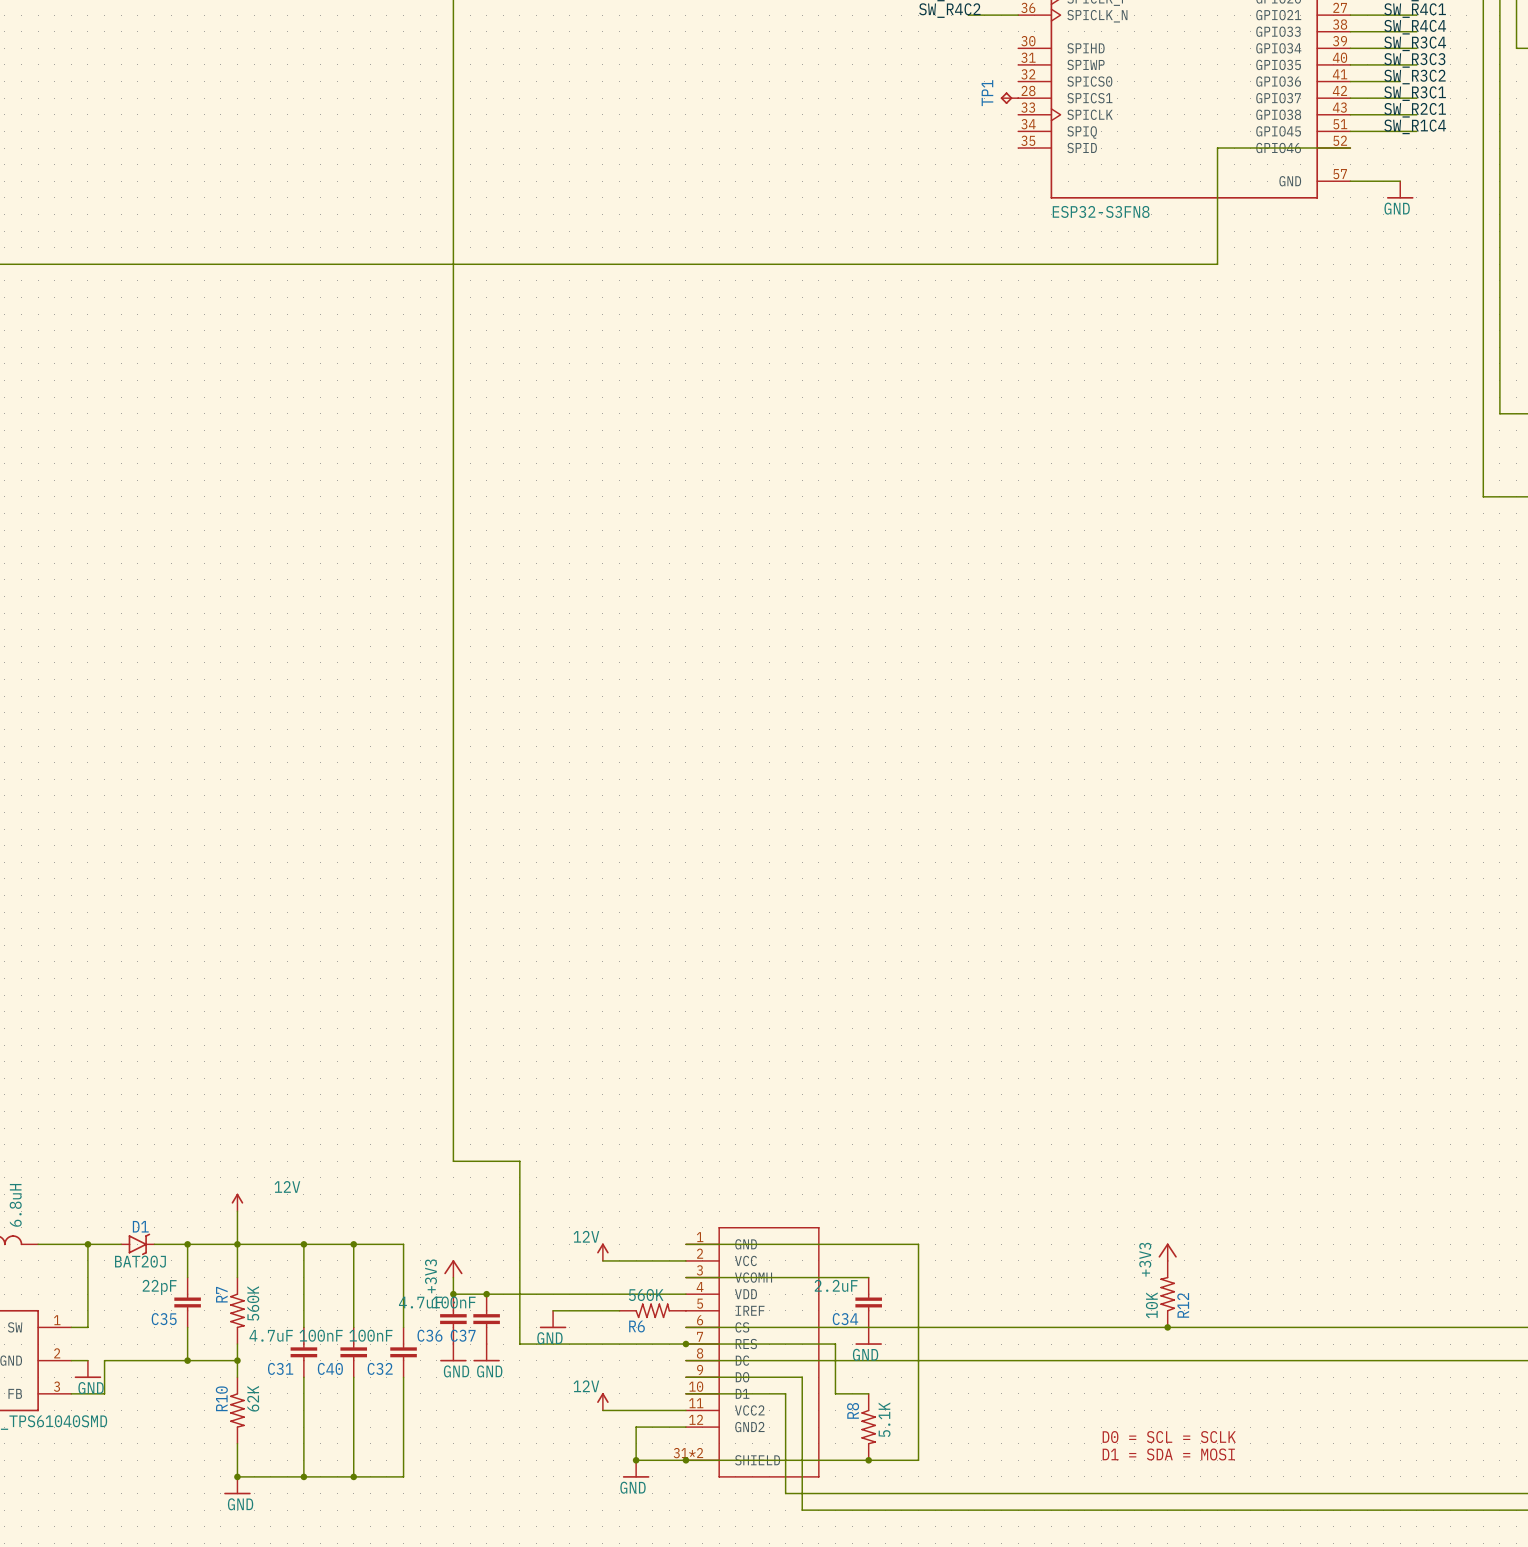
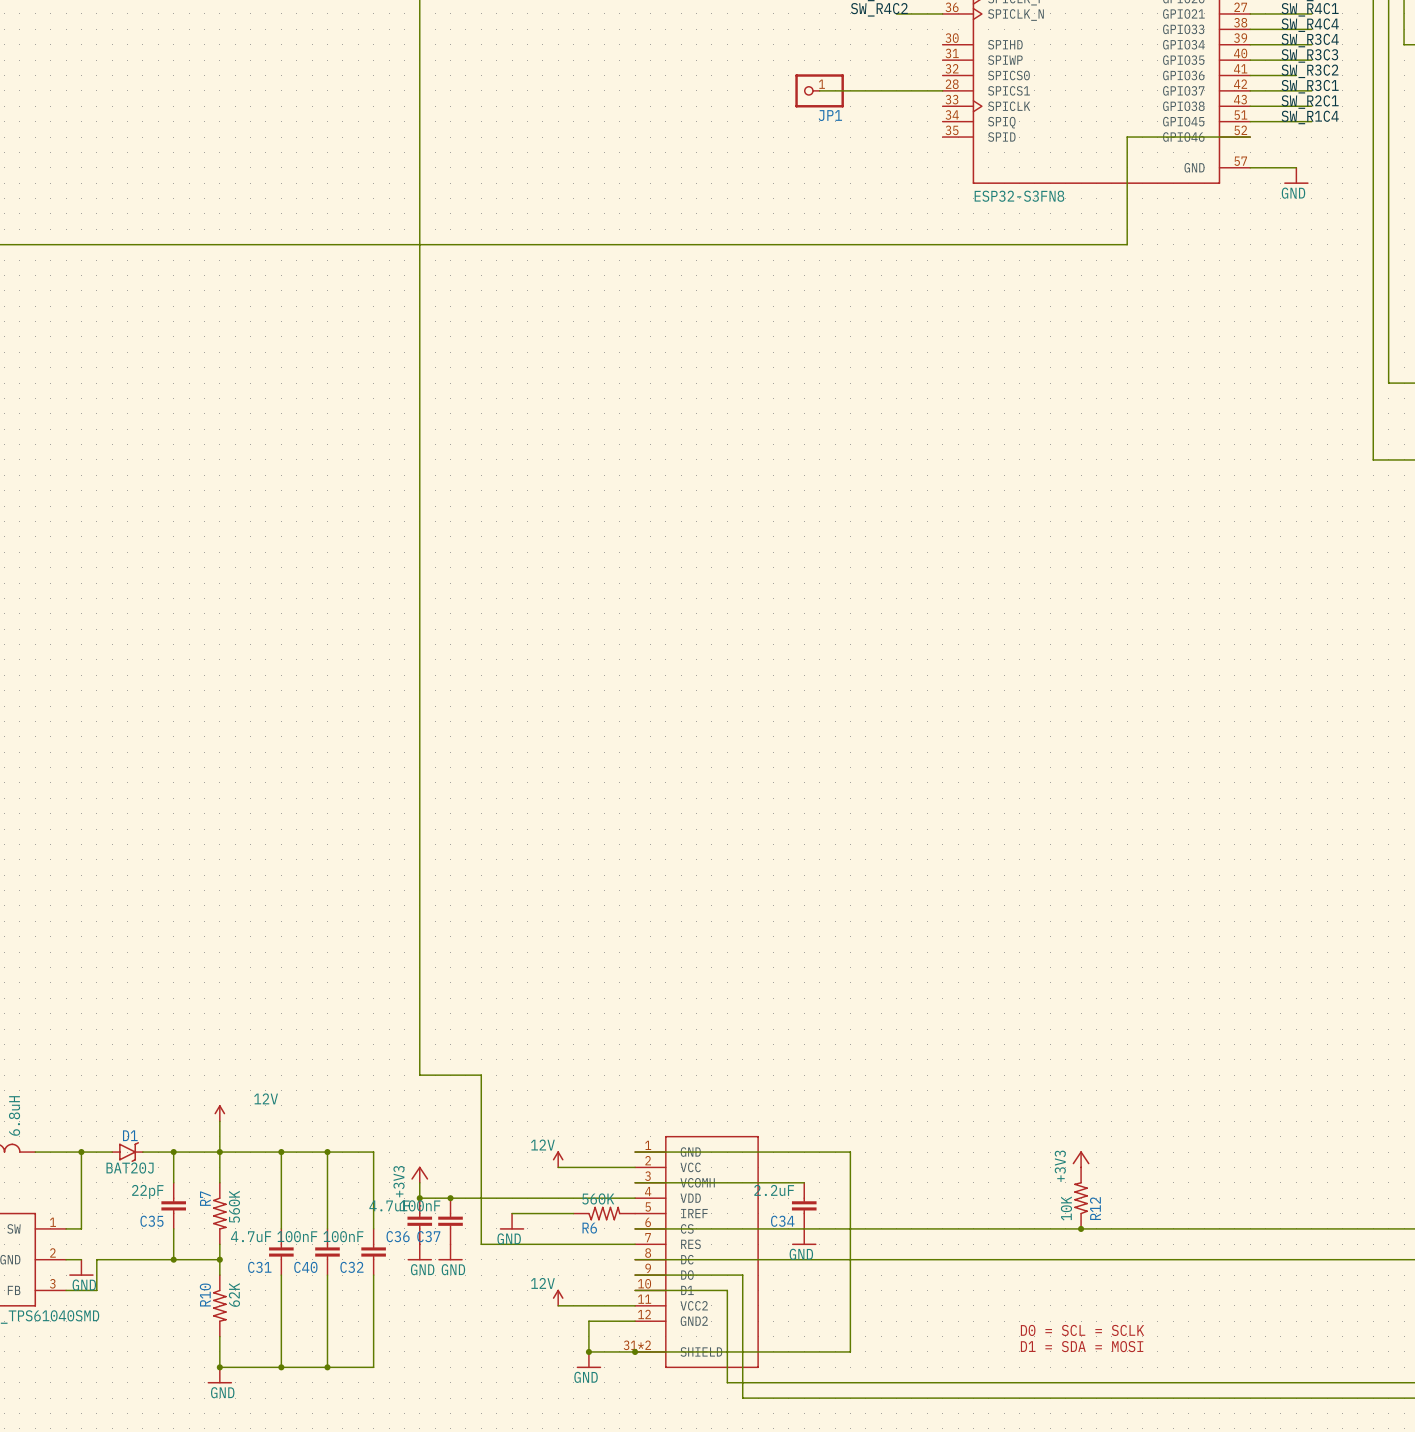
wire: none -> (819, 90) (942, 90)
JP1: none -> (819, 90)
TP1: (1009, 98) -> none
wire: (685, 1344) (835, 1344) (835, 1393) (868, 1393) -> none
junction: (685, 1344) -> none
R8: 5.1K (868, 1427) -> none
junction: (868, 1460) -> none

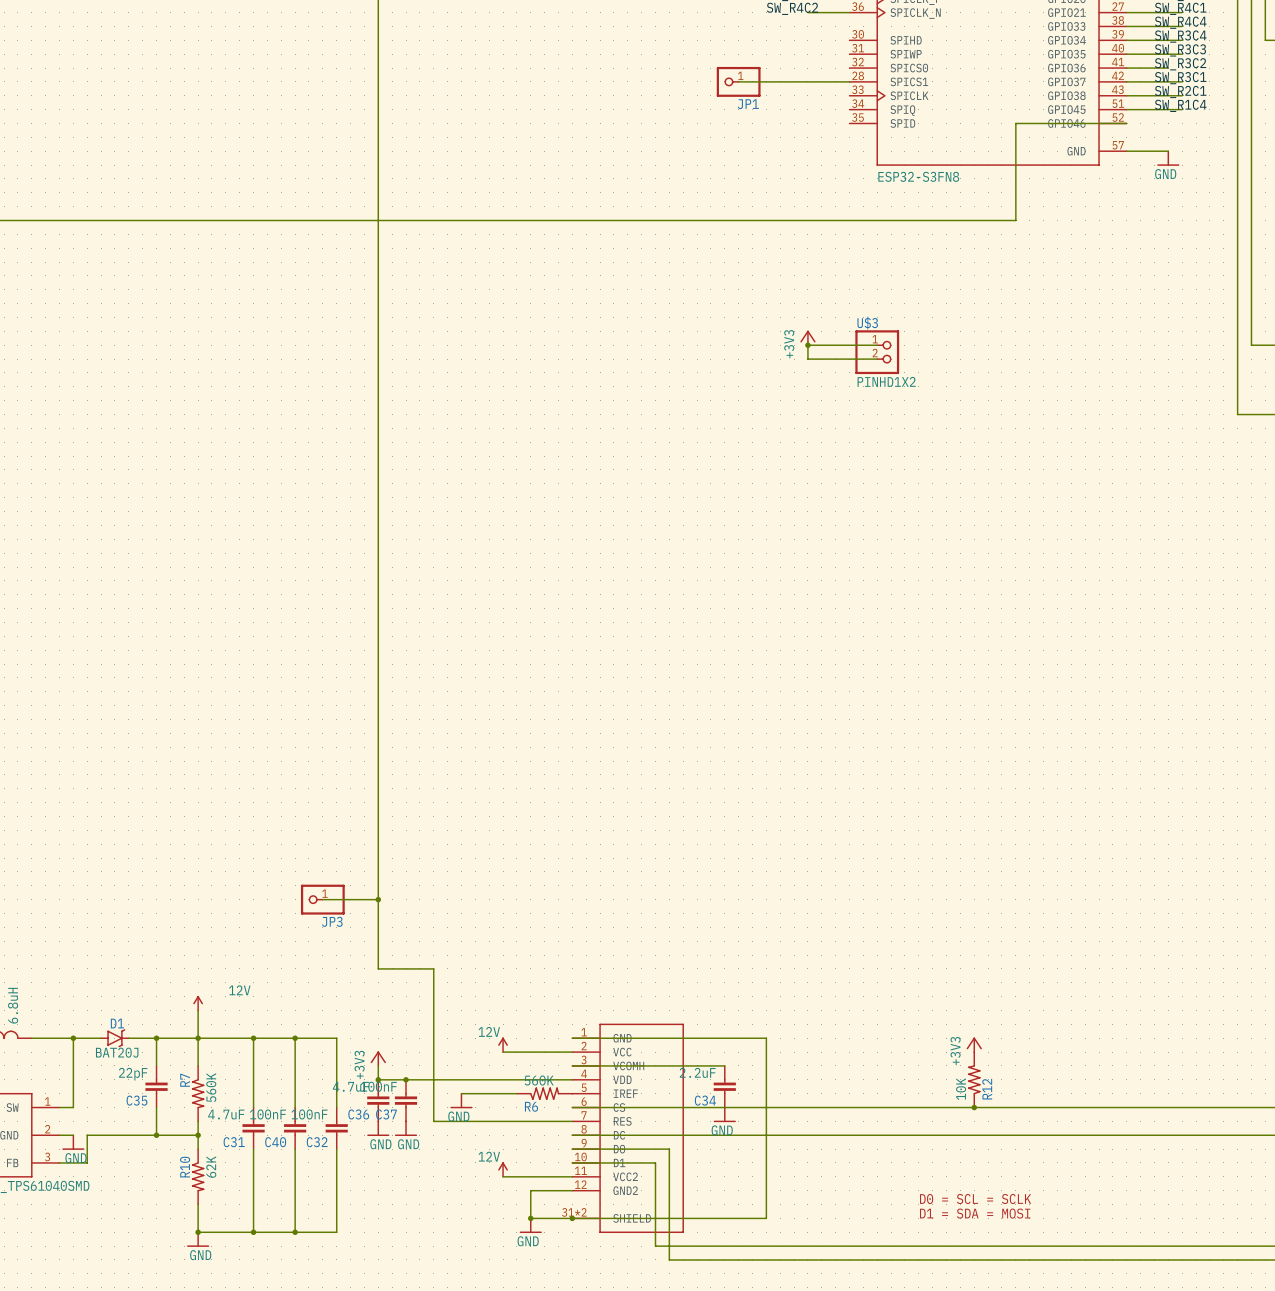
power symbol: none -> +3V3 (807, 337)
junction: none -> (807, 345)
wire: none -> (877, 345) (807, 345) (807, 359) (877, 359)
U$3: none -> PINHD1X2 (877, 352)
wire: none -> (322, 899) (378, 899)
JP3: none -> (322, 899)
junction: none -> (378, 899)

